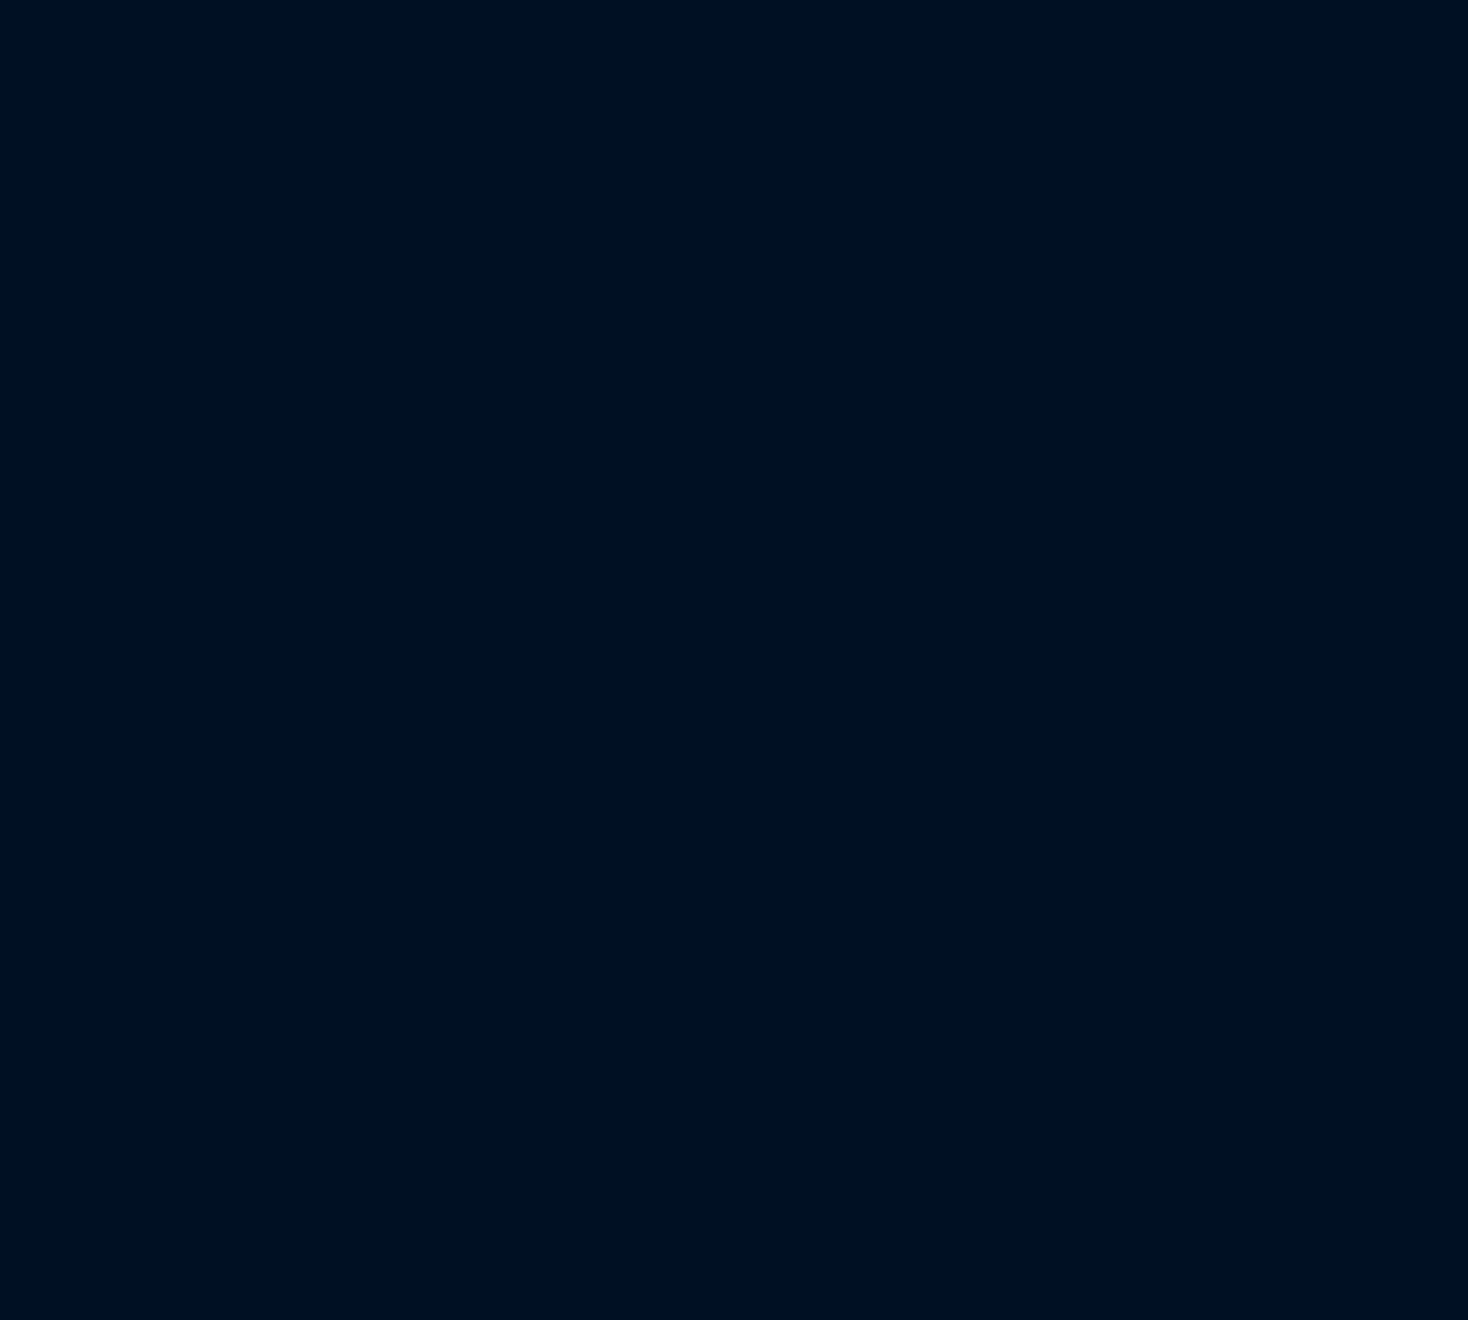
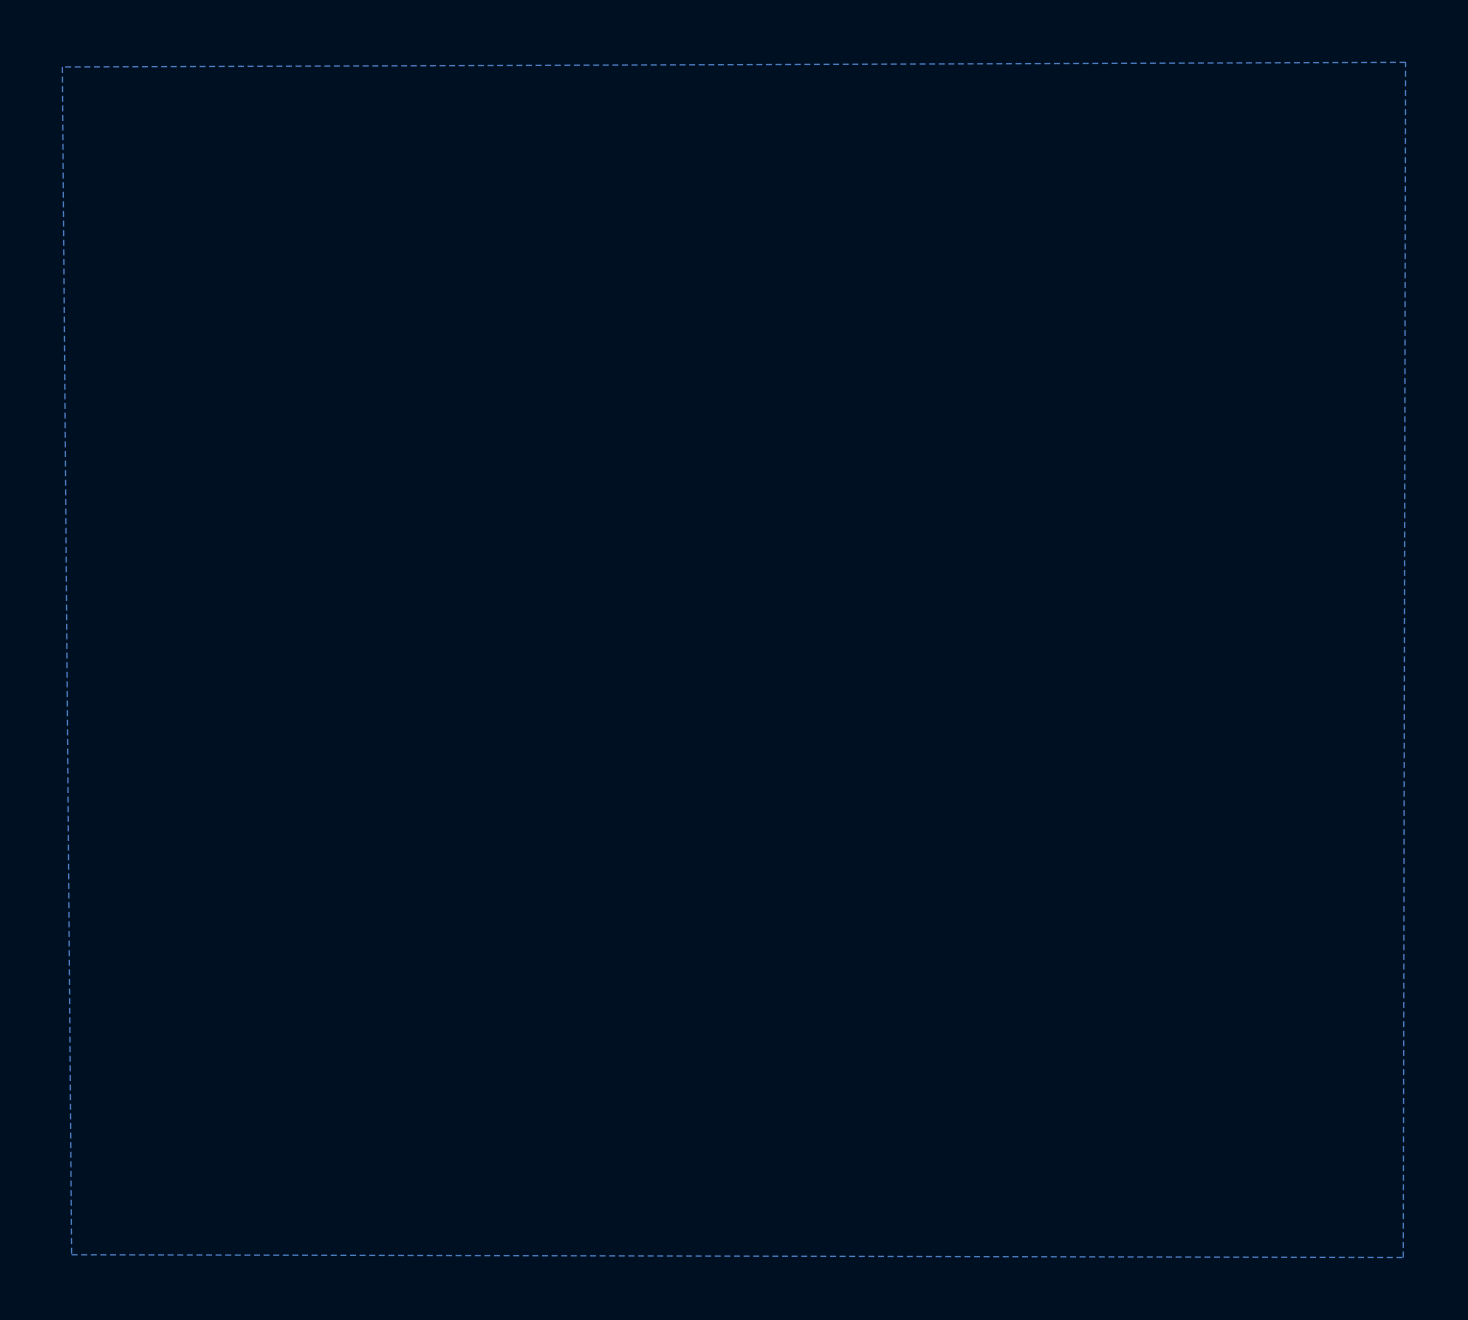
bottom zone outline: none -> (1405, 62) (62, 66) (71, 1254) (1403, 1257) (1405, 62)

